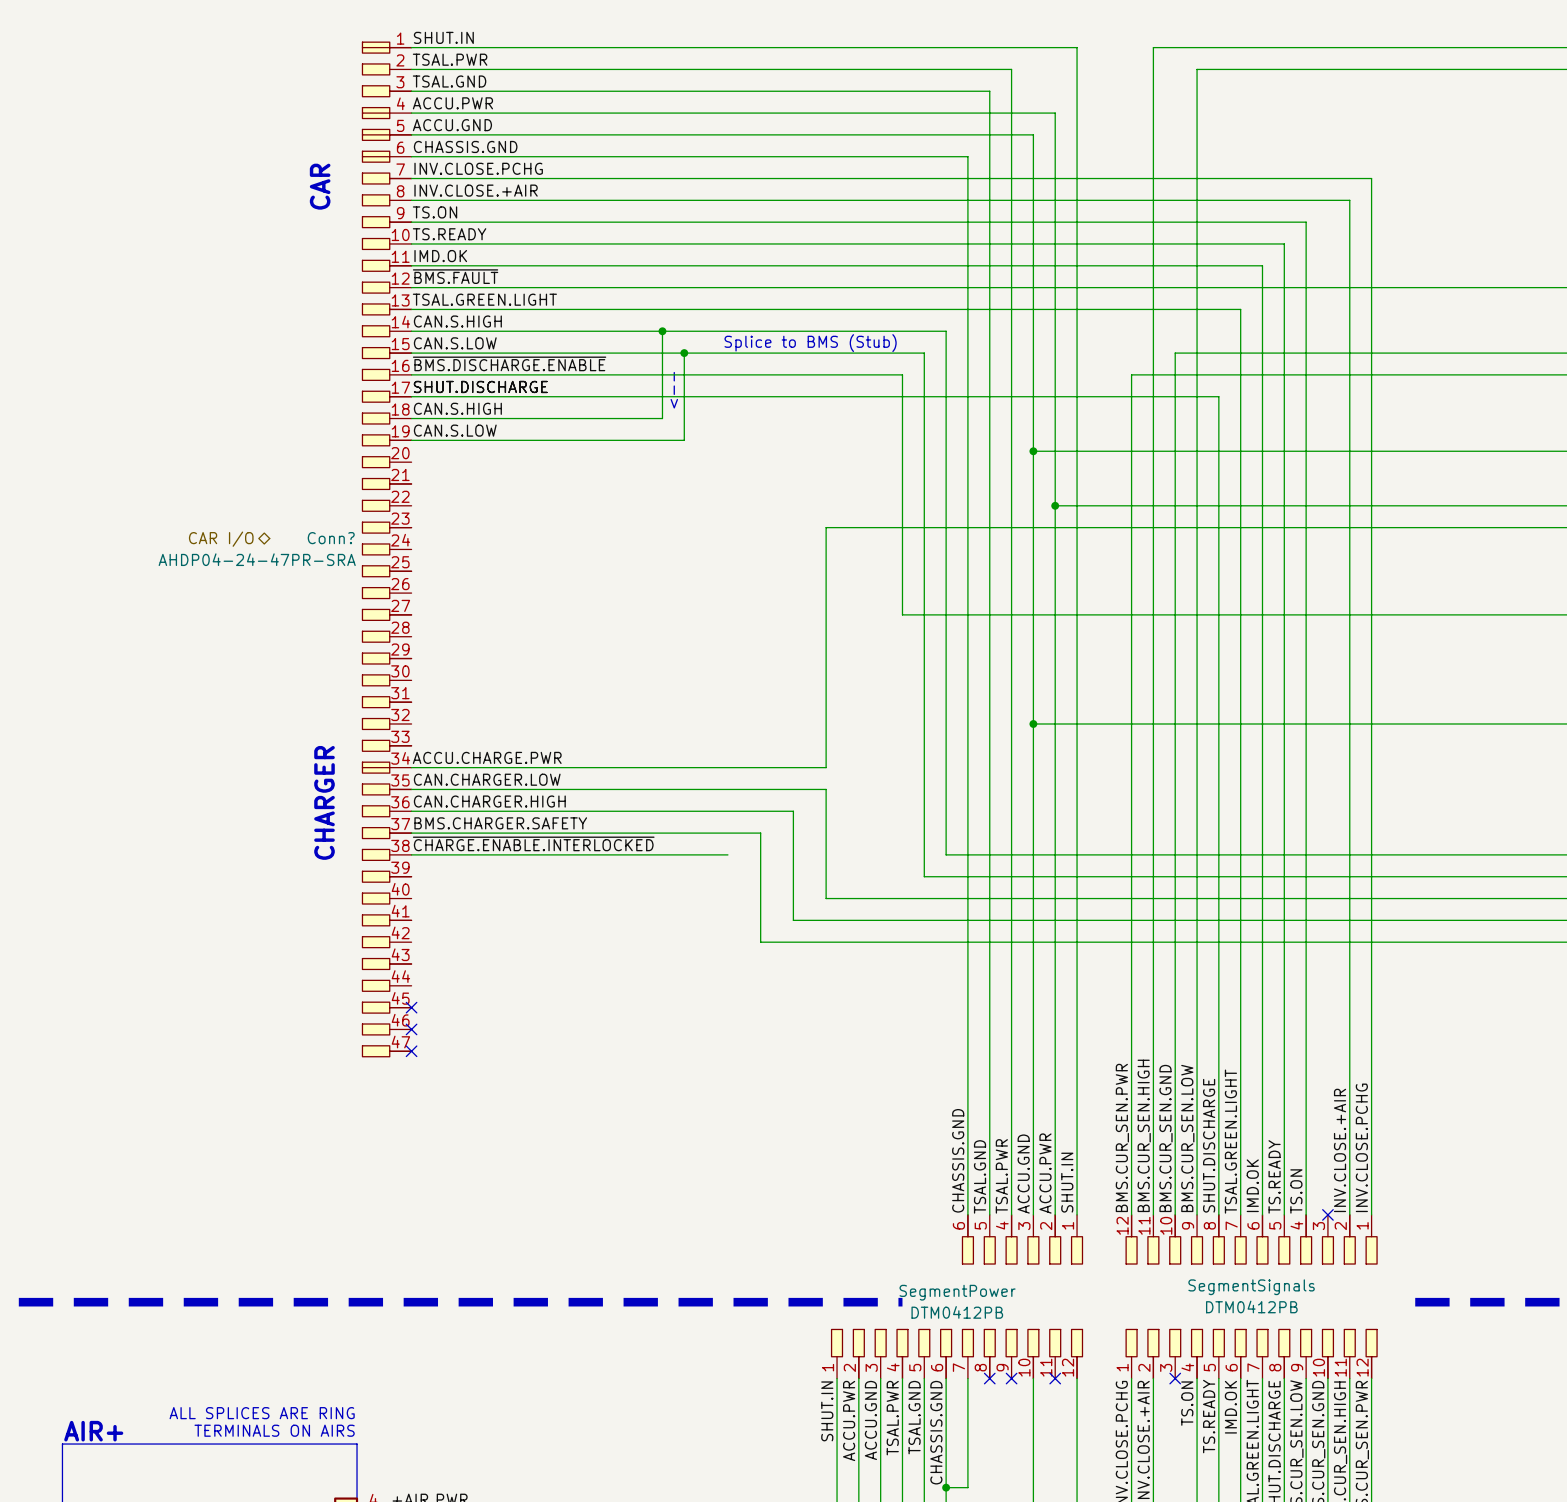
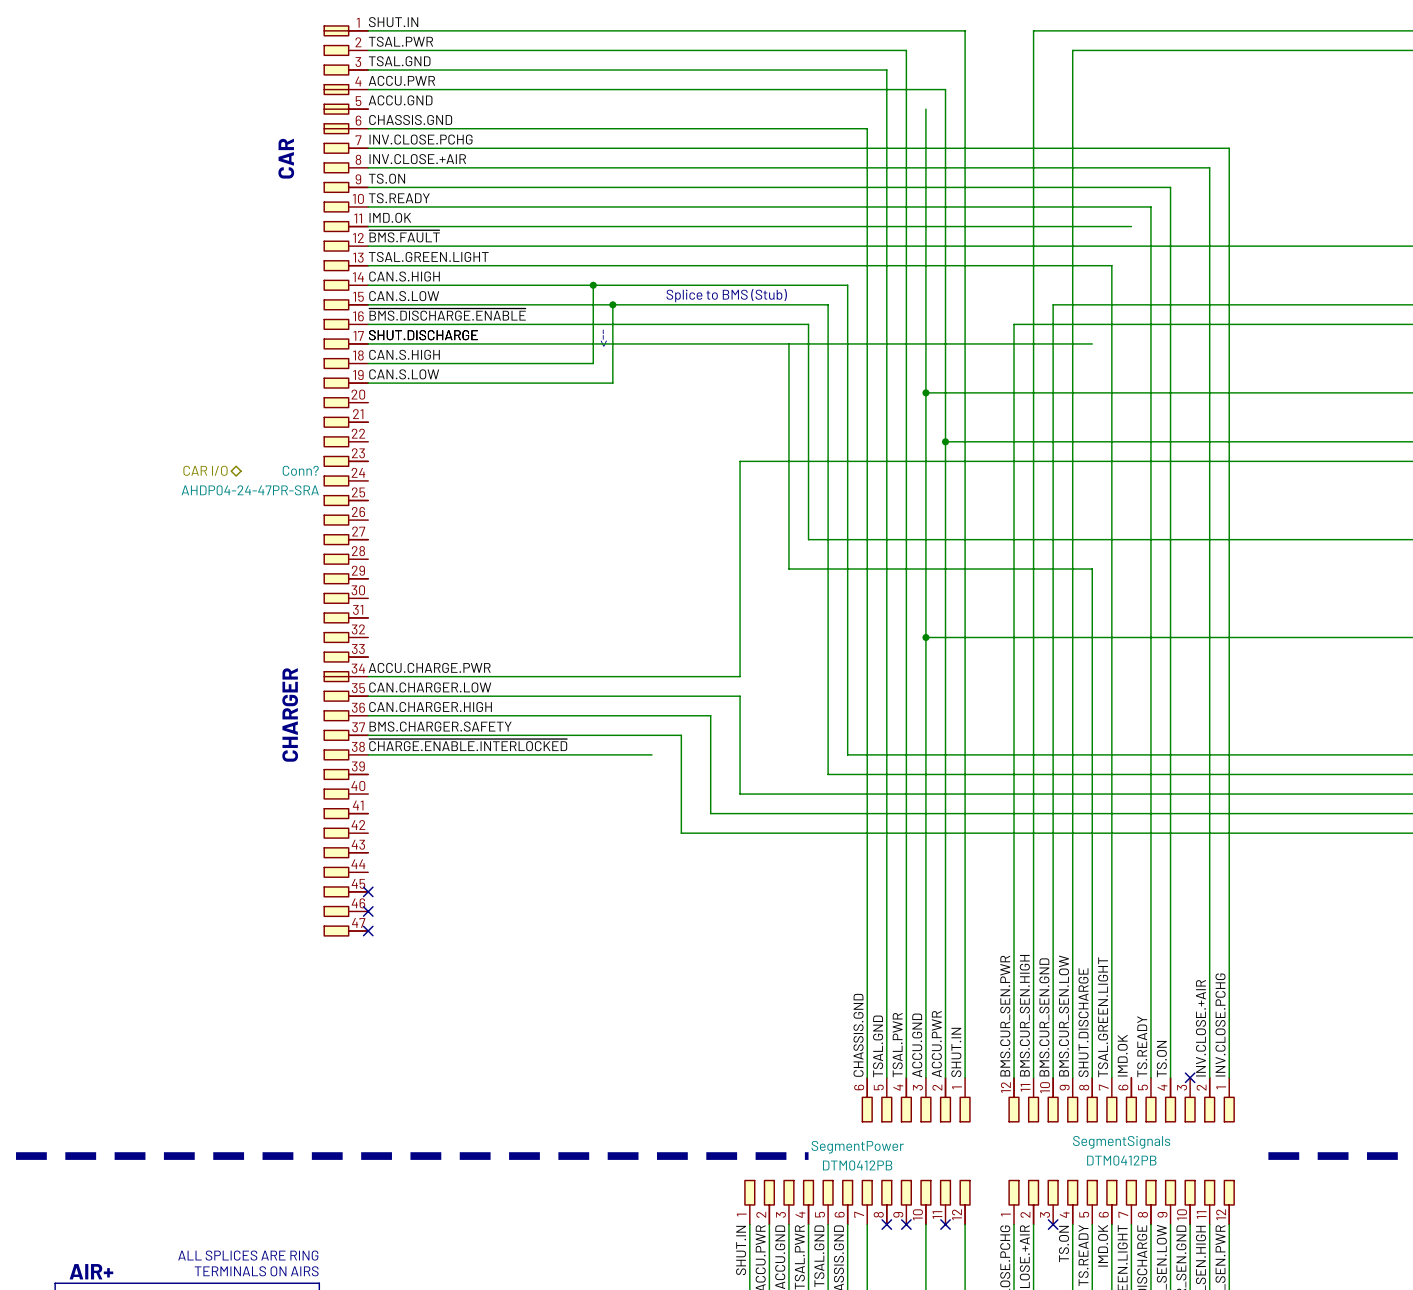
wire: (411, 134) (1033, 134) -> none
wire: (1262, 265) (1262, 1214) -> none
wire: (1218, 396) (1218, 647) -> (788, 343) (788, 569) (1092, 569)

